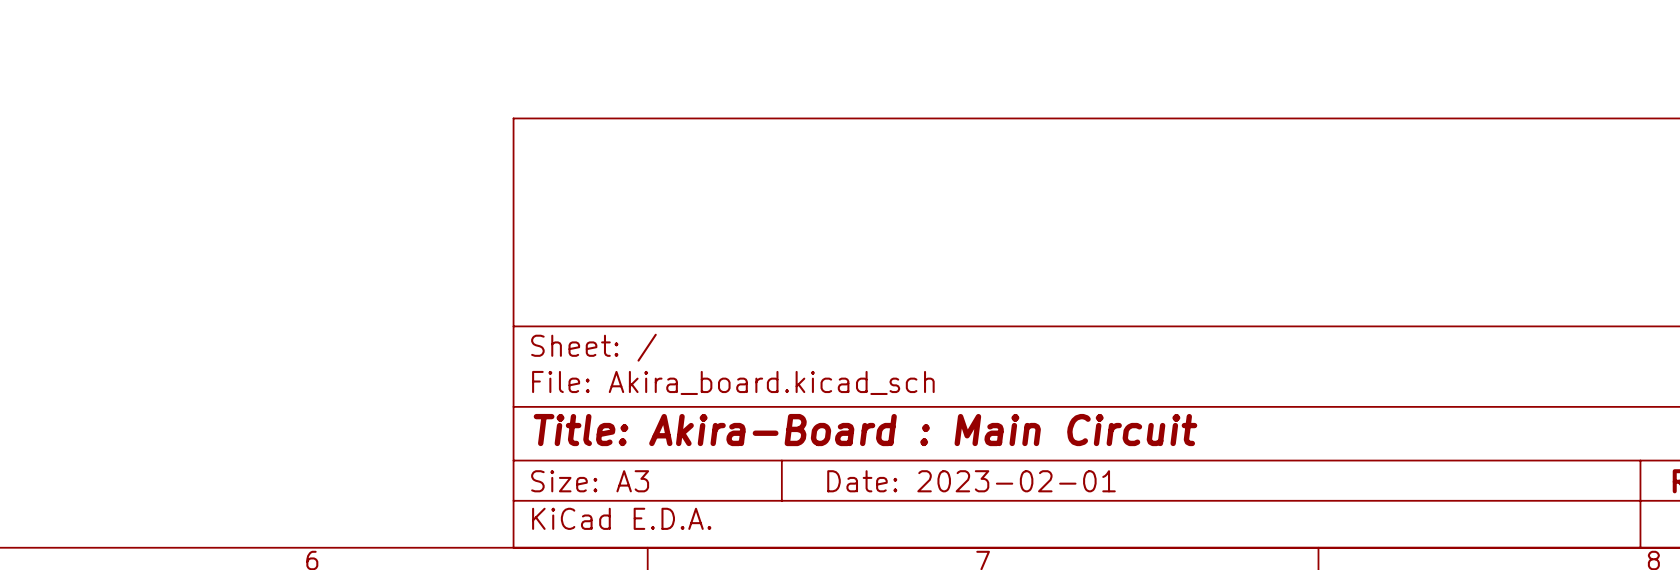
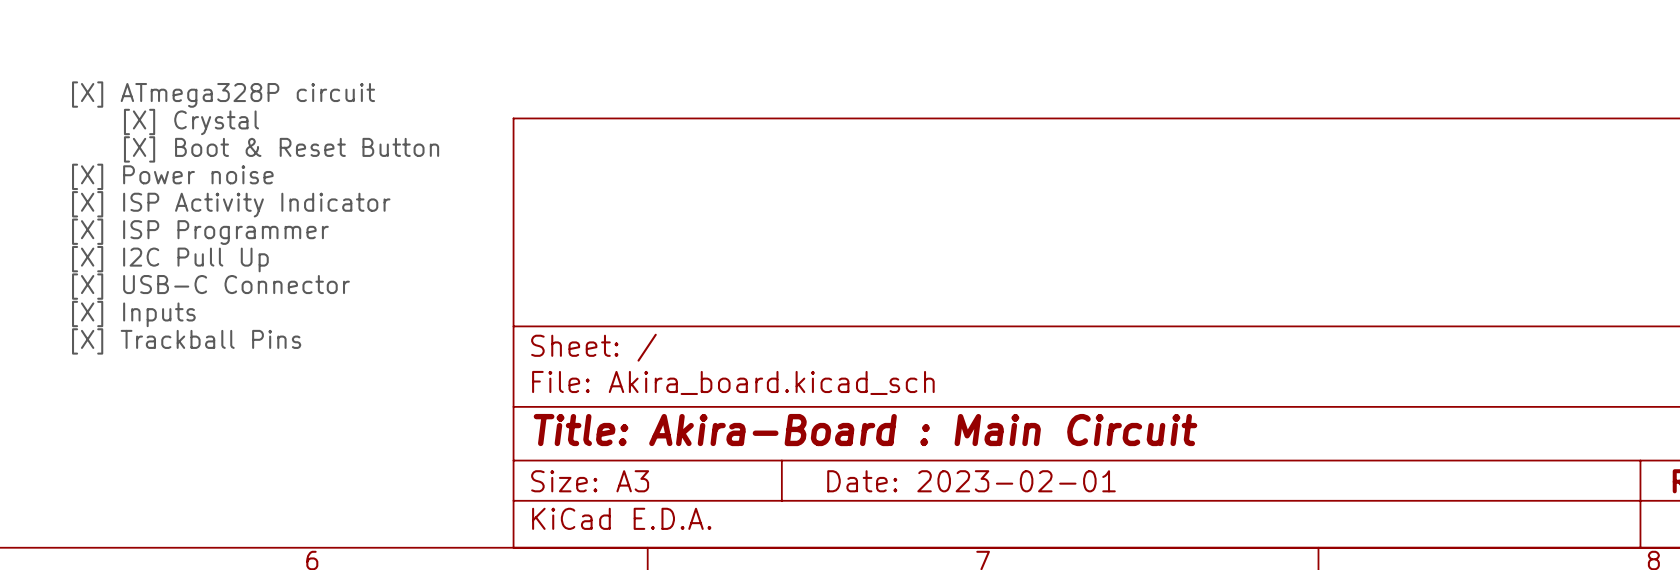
text: none -> [X] ATmega328P circuit (223, 94)
text: none -> [X] Crystal (191, 121)
text: none -> [X] Boot & Reset Button (281, 149)
text: none -> [X] Power noise (172, 176)
text: none -> [X] ISP Activity Indicator (231, 204)
text: none -> [X] ISP Programmer (200, 231)
text: none -> [X] I2C Pull Up (170, 259)
text: none -> [X] USB-C Connector (210, 286)
text: none -> [X] Inputs (133, 314)
text: none -> [X] Trackball Pins (186, 341)

